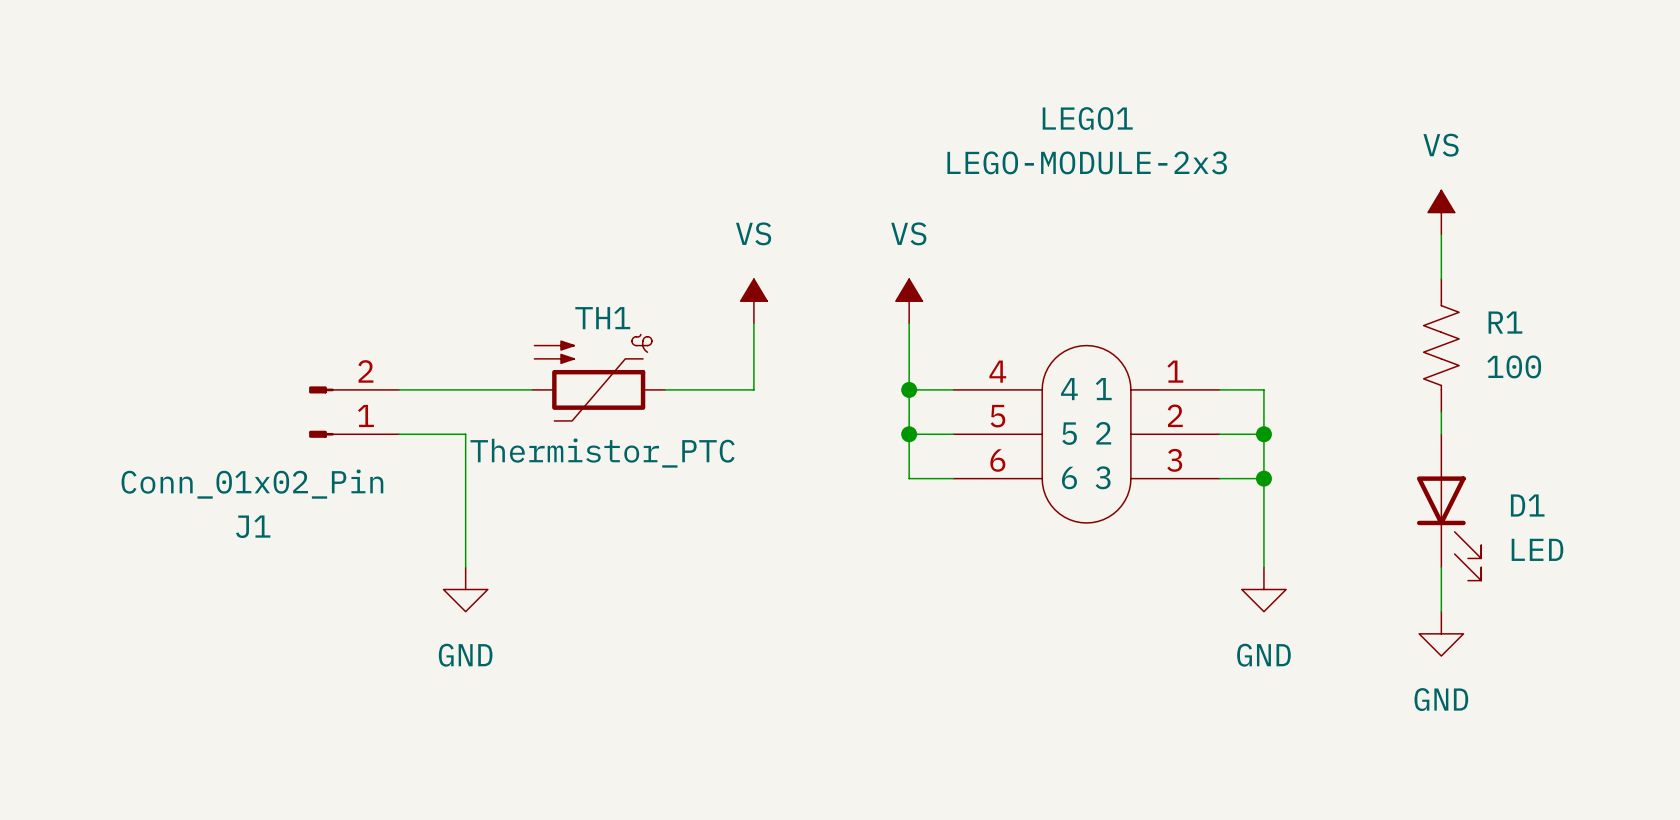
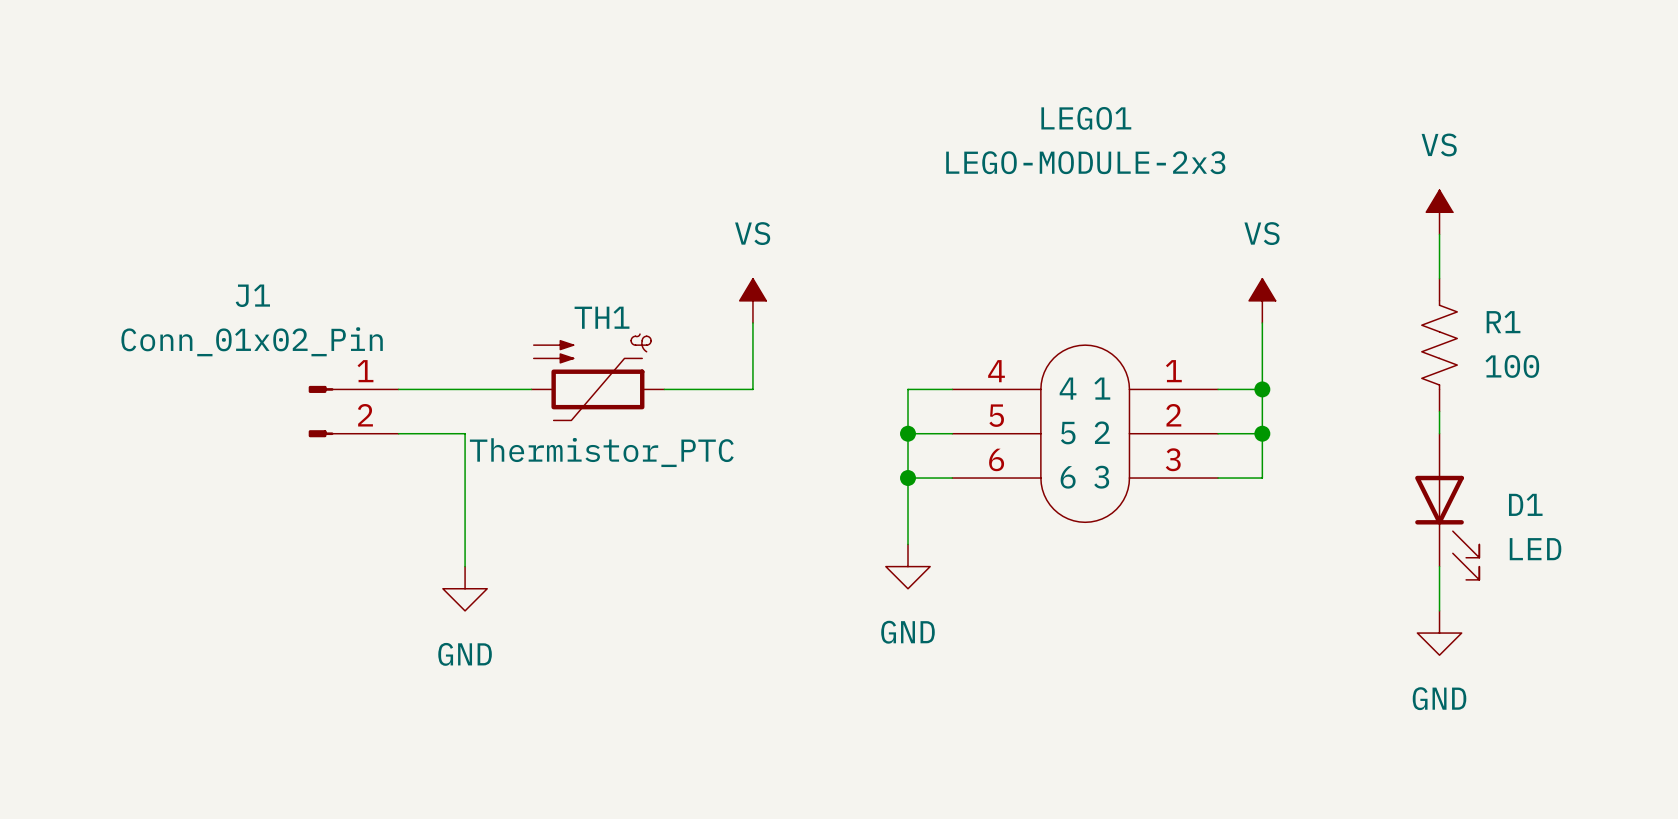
power symbol position: VS (909, 301) -> VS (1262, 300)
wire: (909, 323) (909, 389) -> (908, 478) (908, 544)
wire: none -> (1262, 322) (1262, 389)
junction position: (909, 389) -> (908, 478)
J1 flip: as is (321, 412) -> up-down (321, 411)
wire: (1263, 478) (1263, 567) -> none
junction position: (1263, 478) -> (1262, 389)
power symbol position: GND (1263, 589) -> GND (908, 566)

